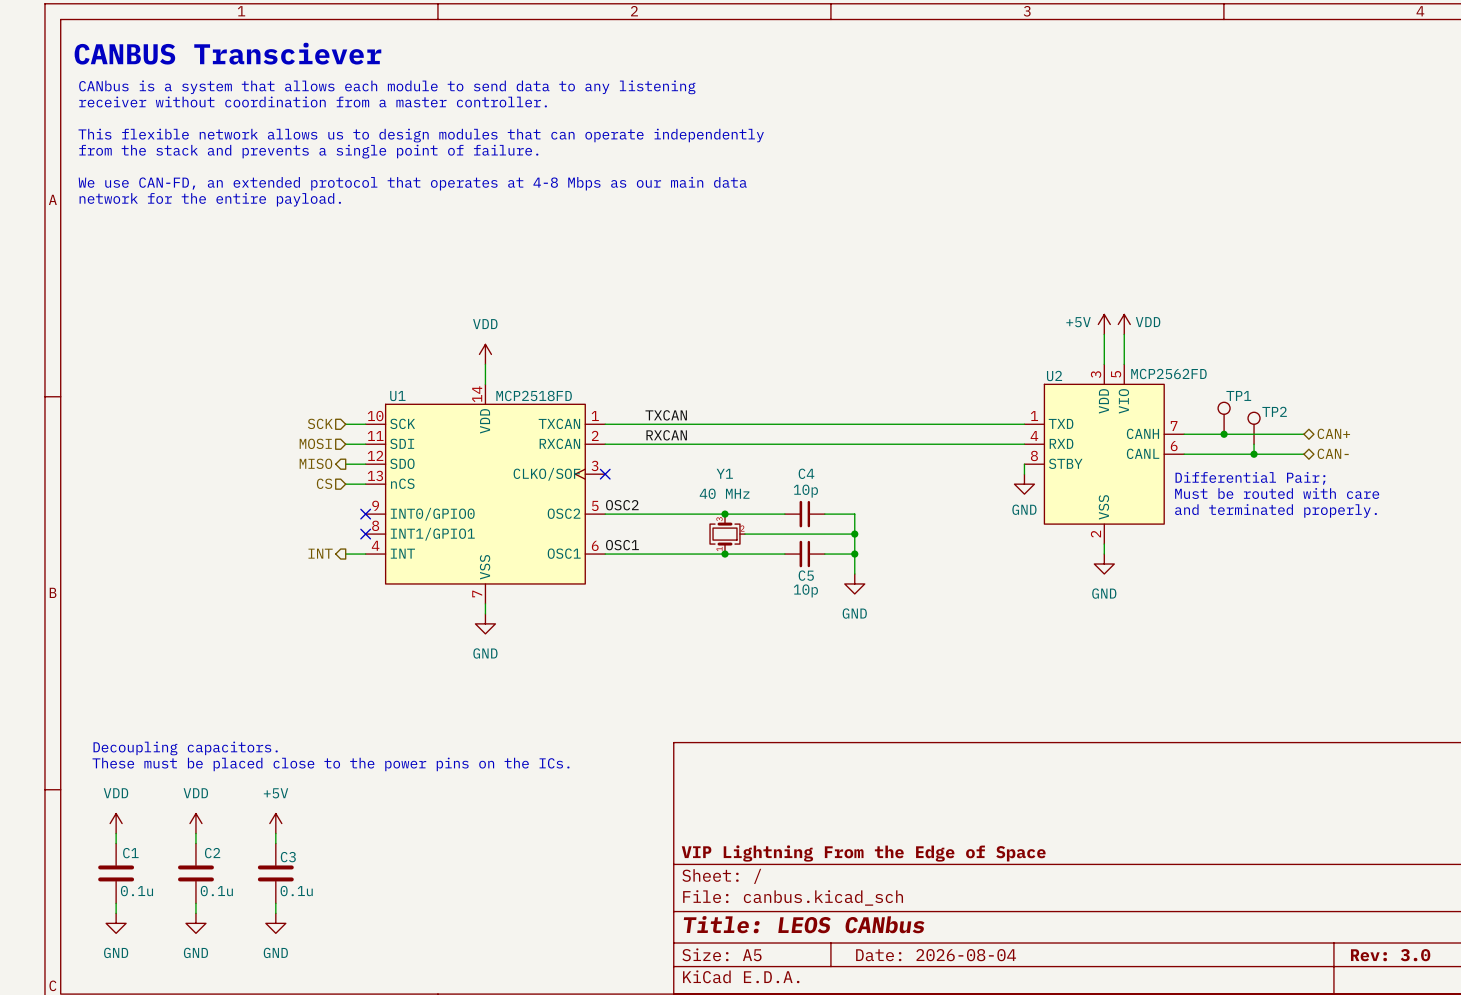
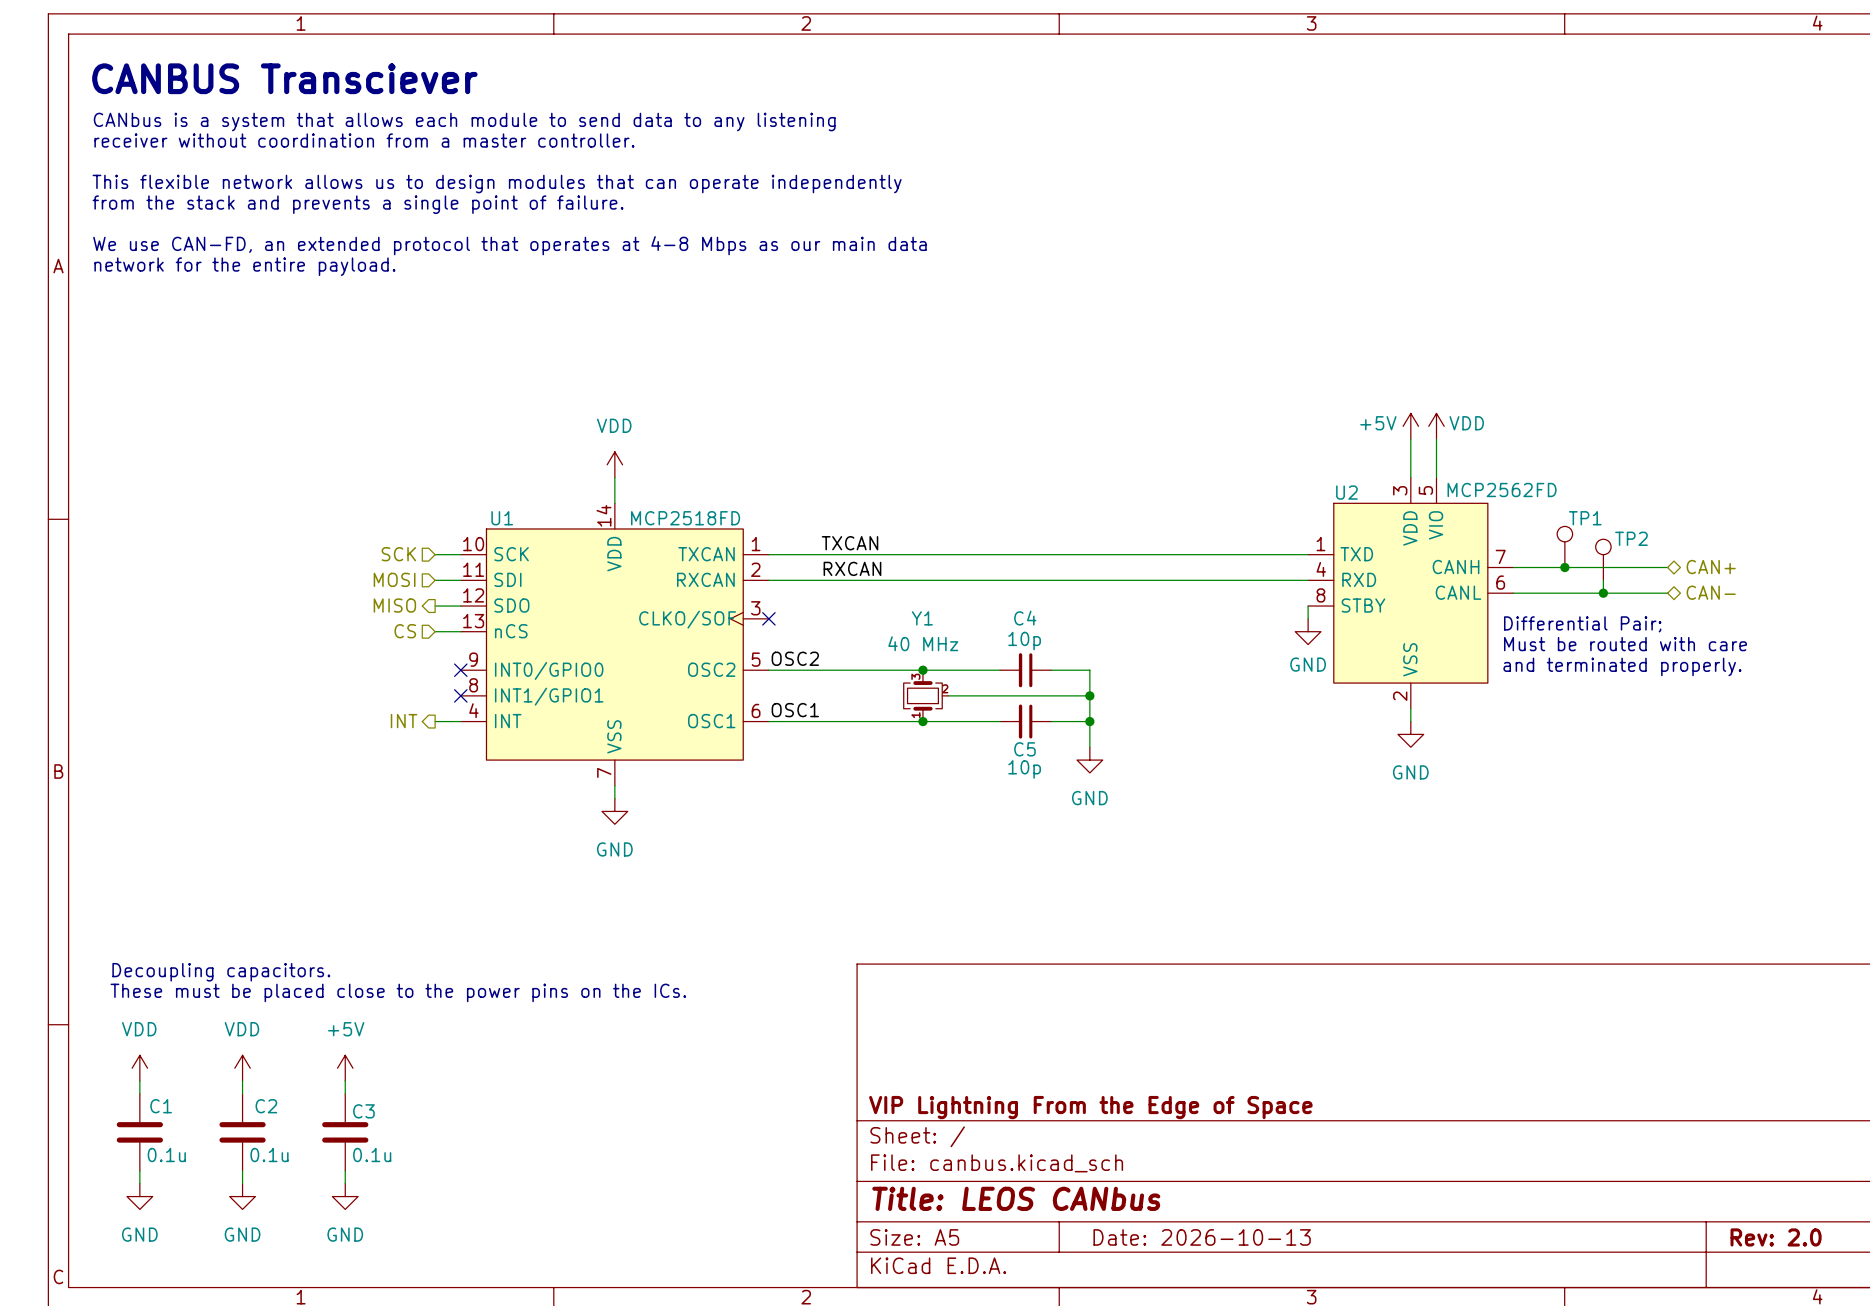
title block: Date: 2026-08-04 (936, 955) -> Date: 2026-10-13 (1202, 1237)
title block: Rev: 3.0 (1390, 955) -> Rev: 2.0 (1776, 1237)

